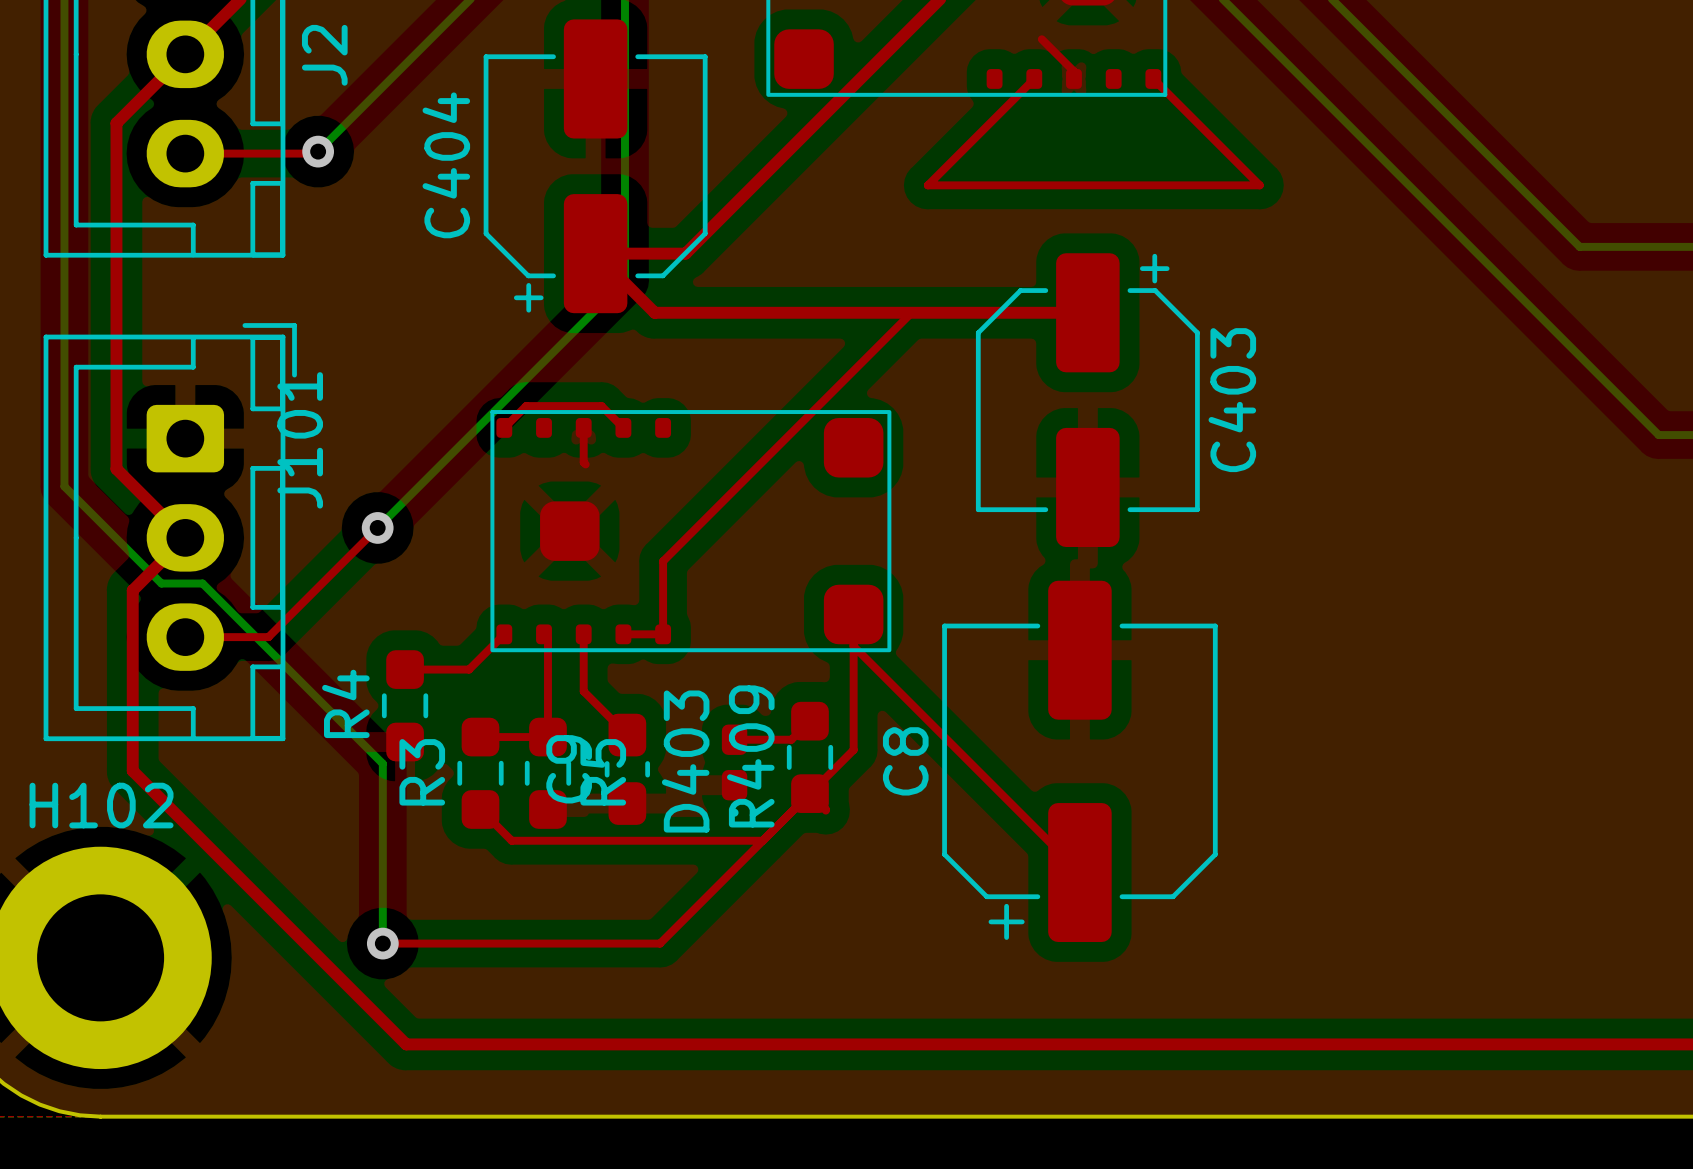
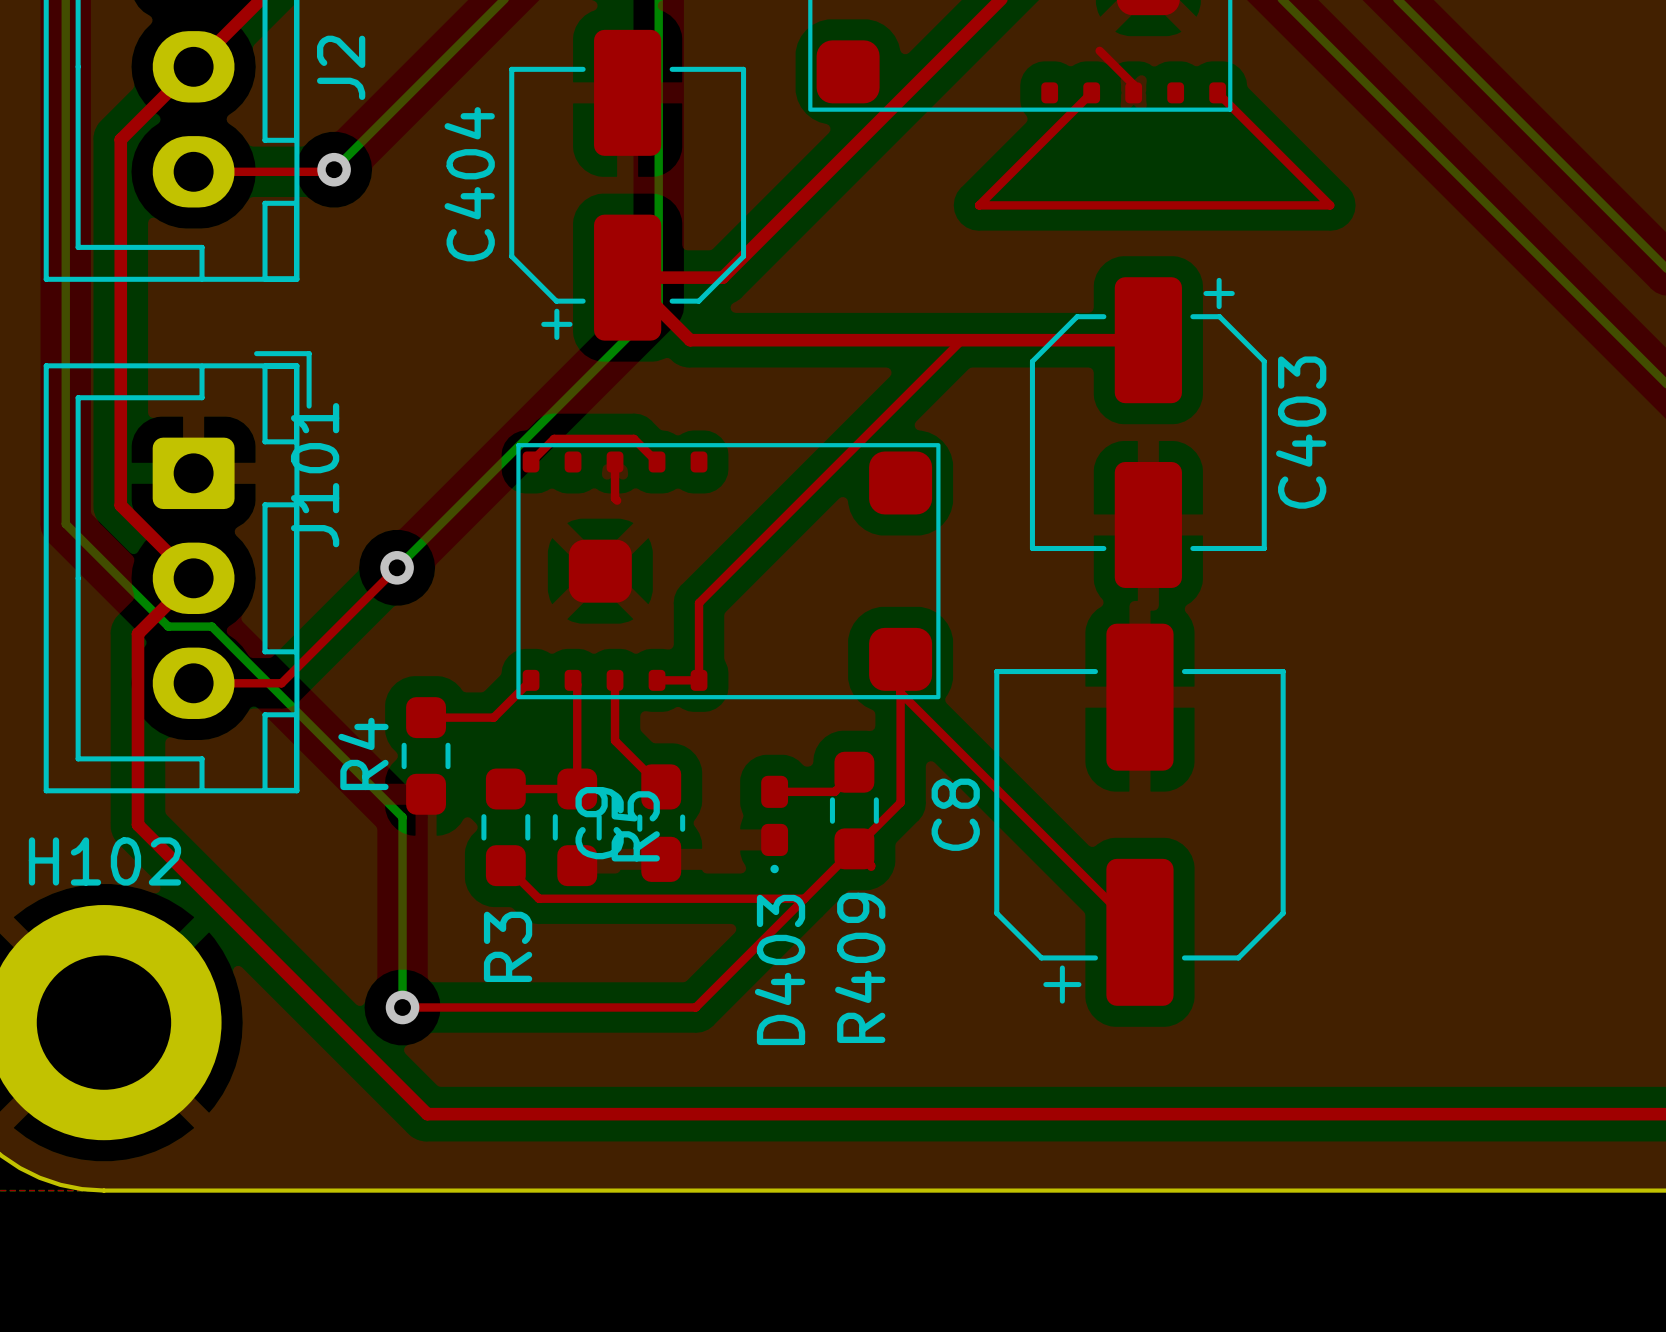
R409 name position: R409 (750, 756) -> R409 (860, 967)
D403 name position: D403 (685, 761) -> D403 (780, 969)
R3 name position: R3 (422, 772) -> R3 (508, 946)

